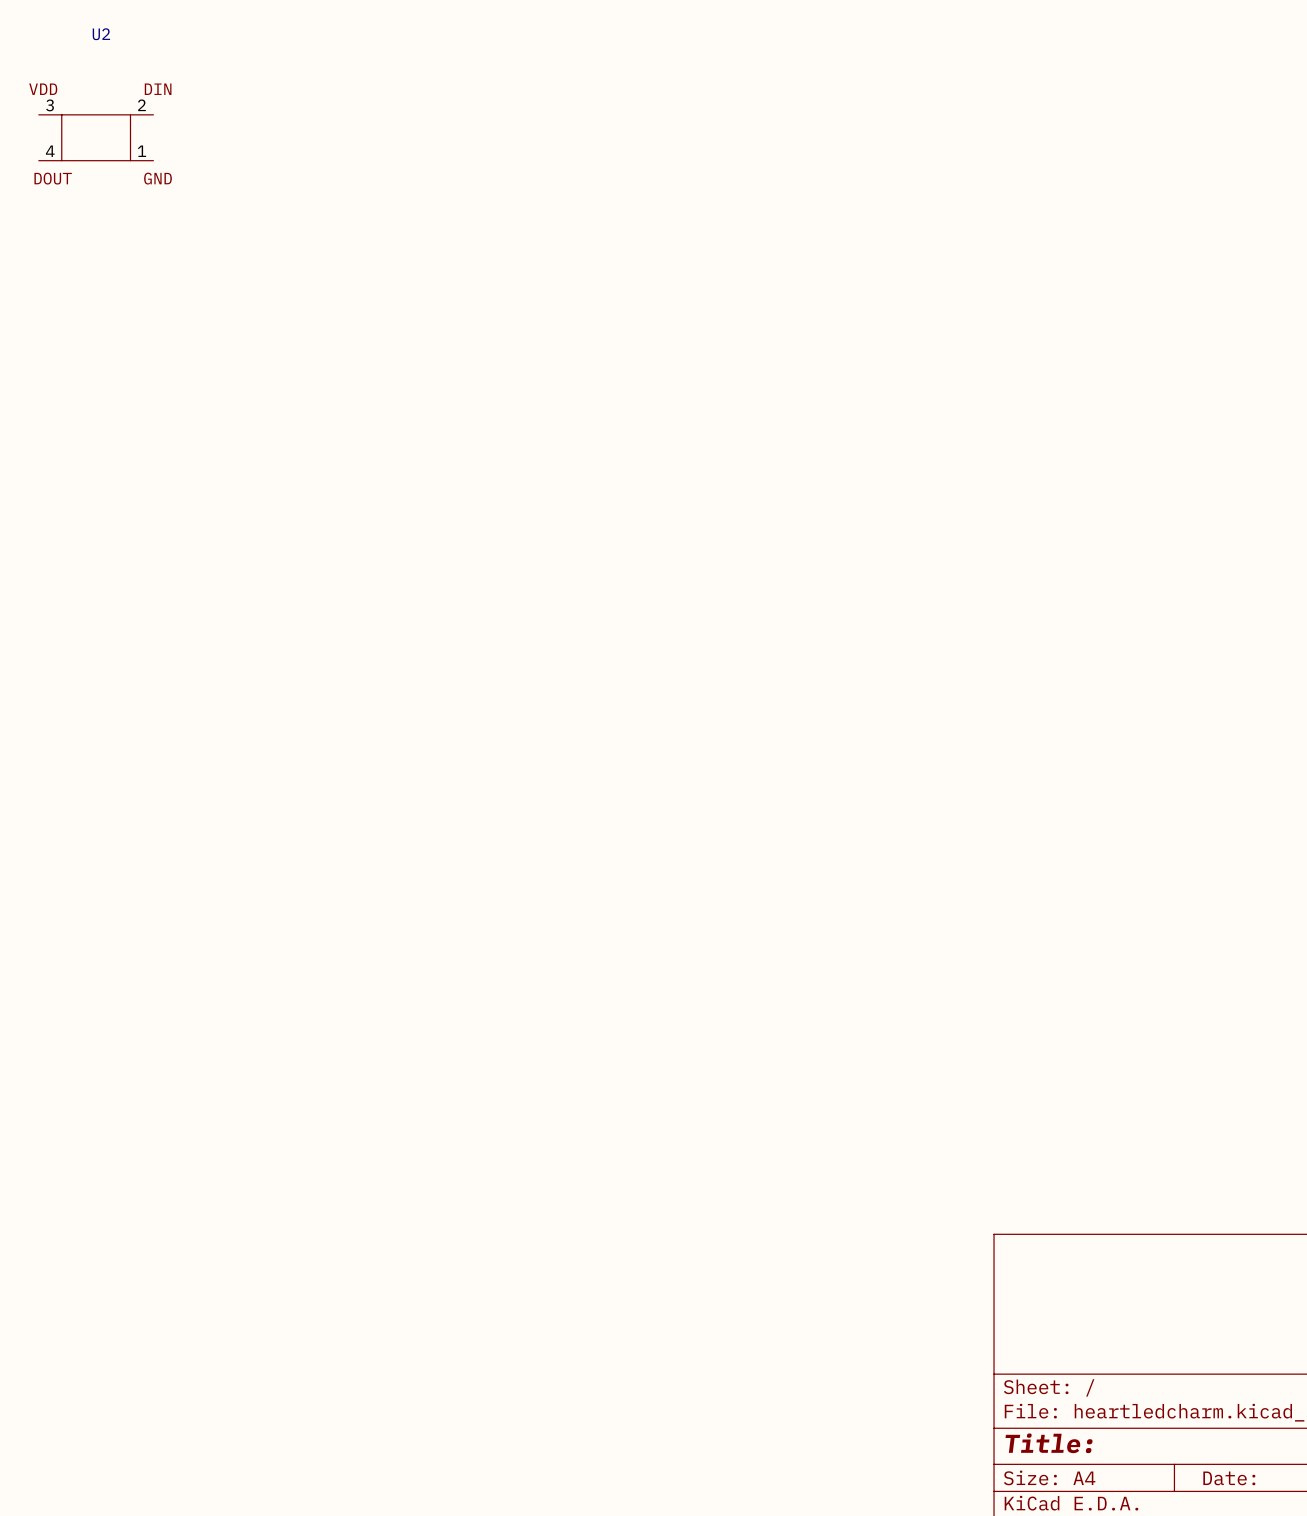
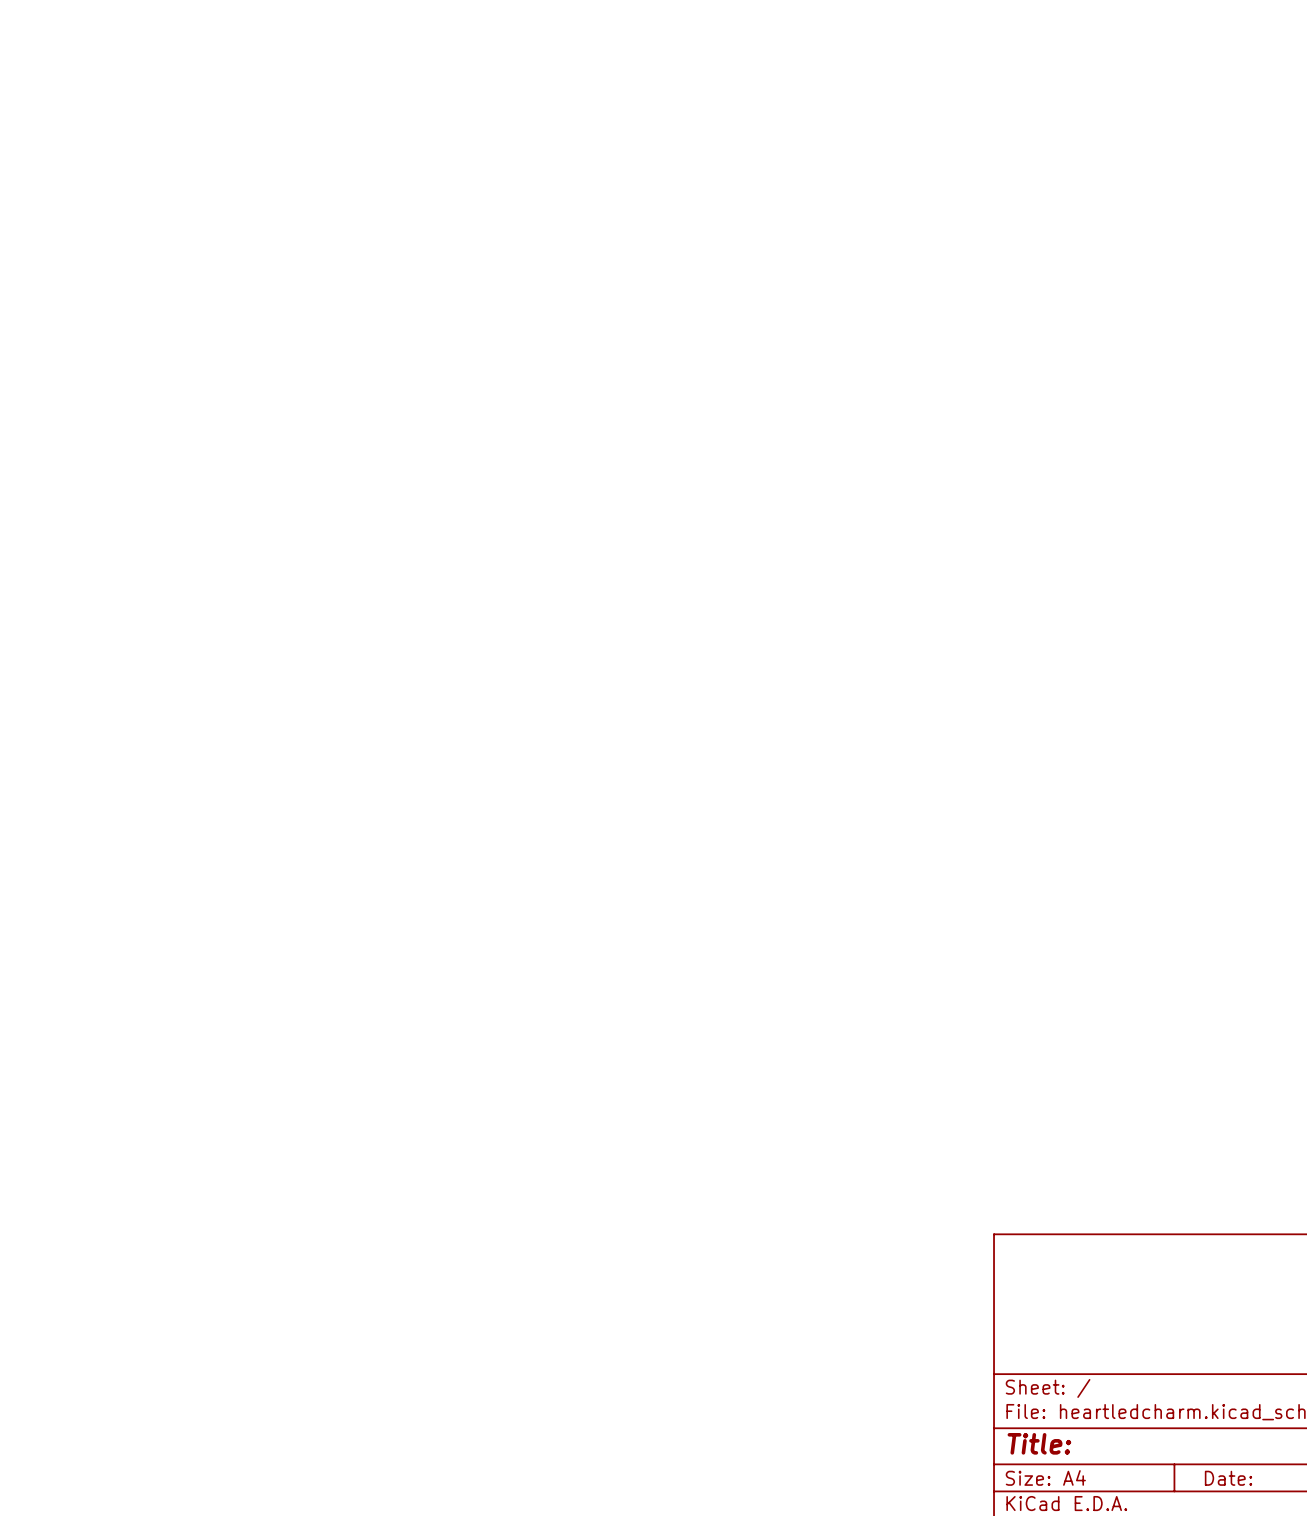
U2: (96, 137) -> none

